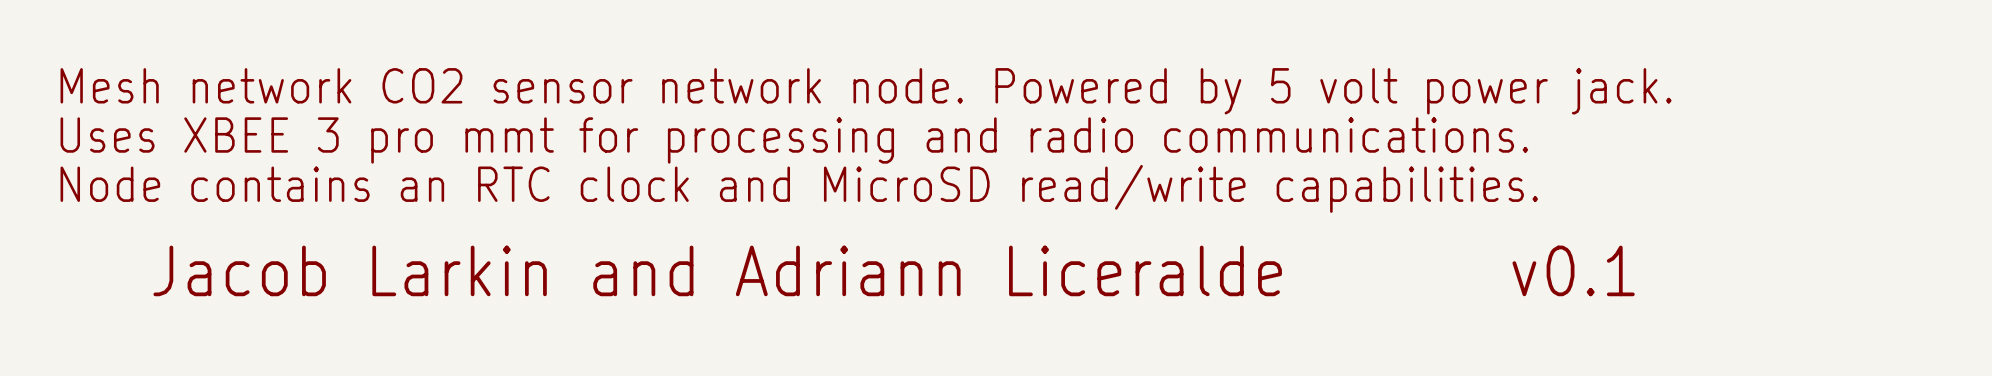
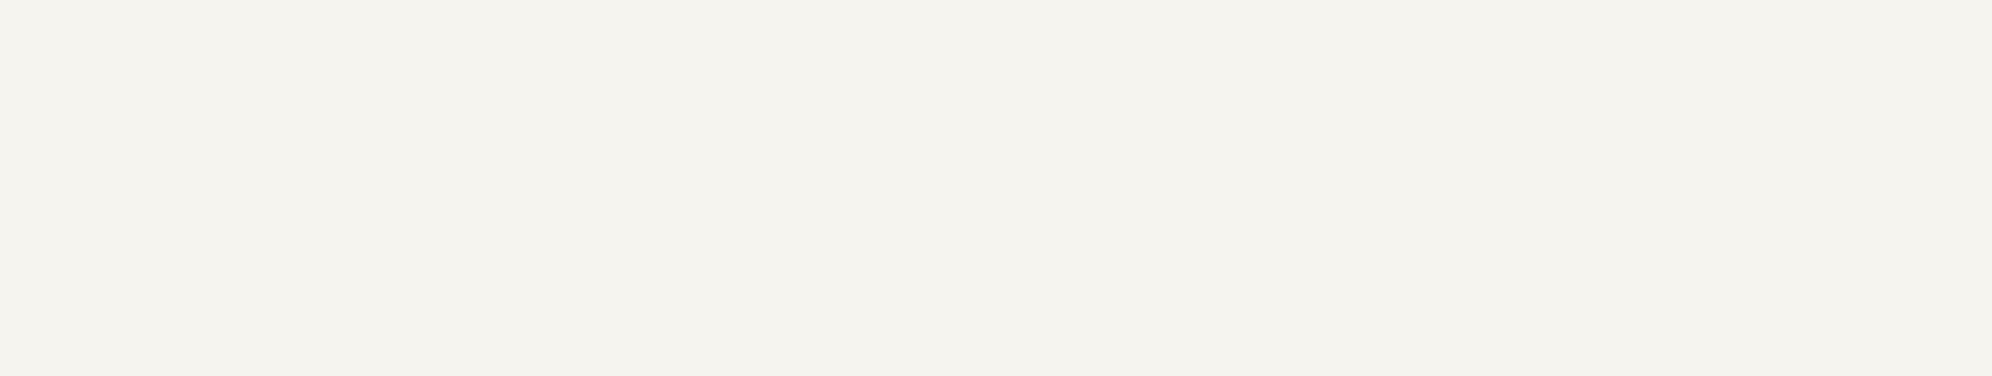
text: Mesh network CO2 sensor network node. Powered by 5 volt power jack. (866, 91) -> none
text: Uses XBEE 3 pro mmt for processing and radio communications. (794, 140) -> none
text: Node contains an RTC clock and MicroSD read/write capabilities. (799, 188) -> none
text: Jacob Larkin and Adriann Liceralde (717, 270) -> none
text: v0.1 (1573, 270) -> none

